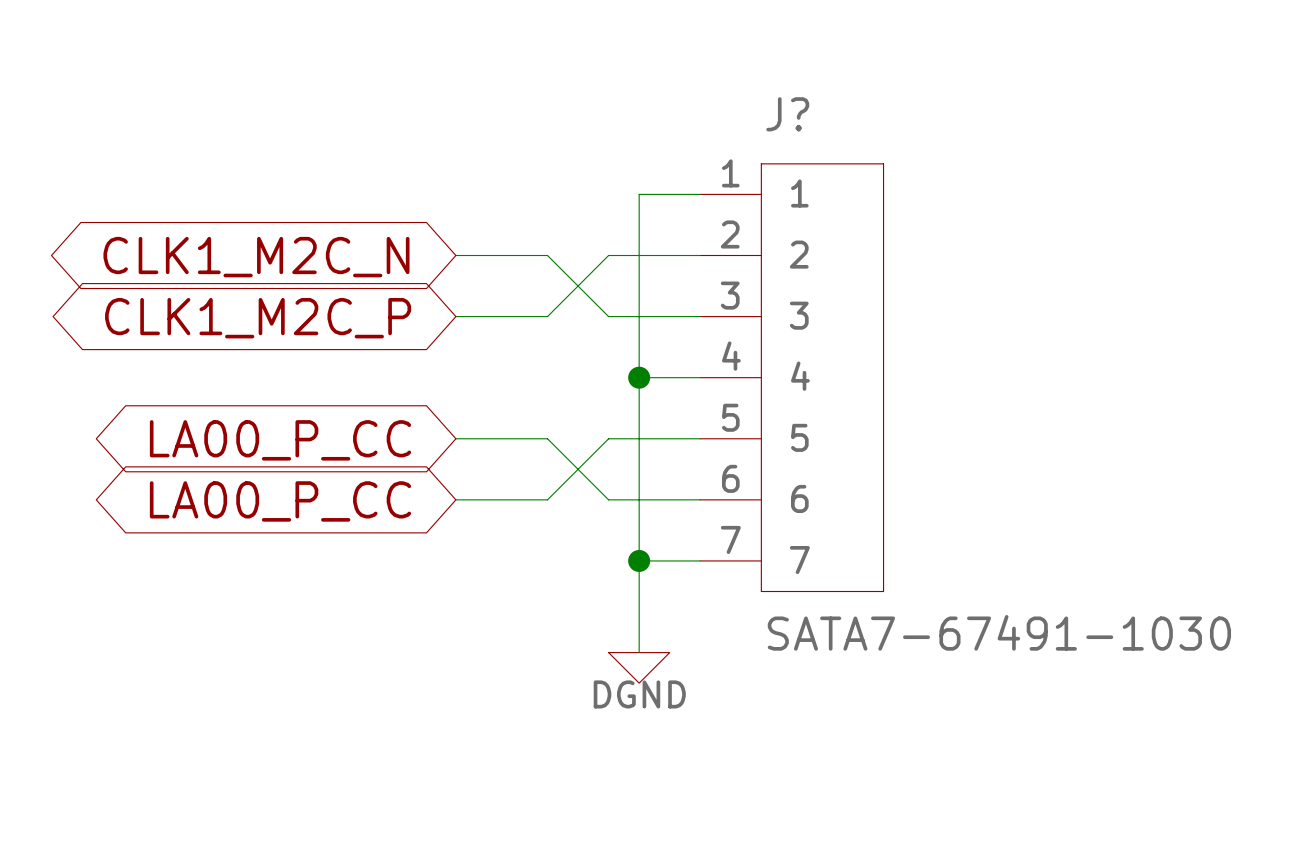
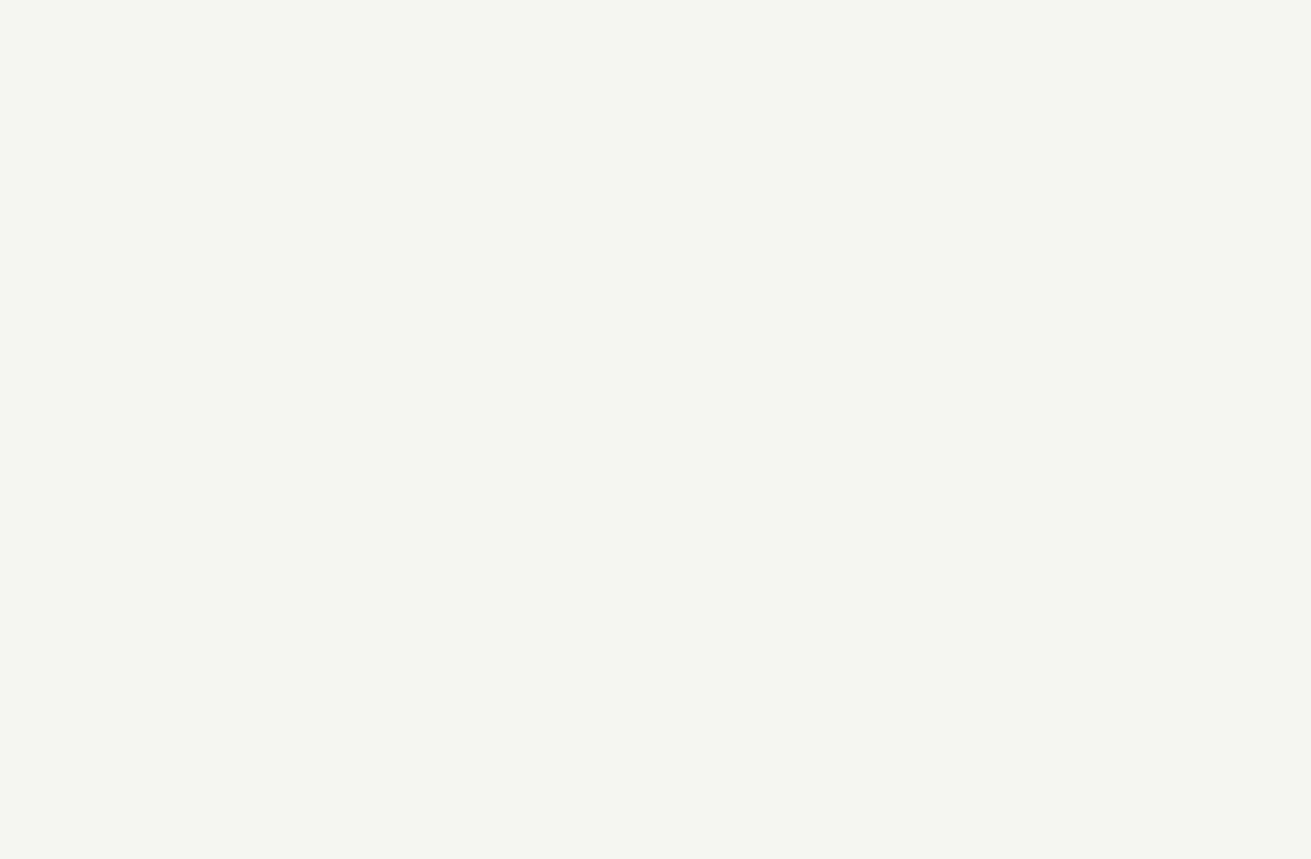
wire: (700, 194) (639, 194) (639, 652) -> none
wire: (455, 255) (547, 255) (608, 316) (700, 316) -> none
wire: (700, 255) (608, 255) (547, 316) (455, 316) -> none
global label: CLK1_M2C_N (256, 257) -> none
global label: CLK1_M2C_P (258, 318) -> none
wire: (639, 377) (700, 377) -> none
junction: (639, 377) -> none
J?: SATA7-67491-1030 (791, 377) -> none
wire: (455, 438) (547, 438) (608, 499) (700, 499) -> none
wire: (700, 438) (608, 438) (547, 499) (455, 499) -> none
global label: LA00_P_CC (280, 440) -> none
global label: LA00_P_CC (280, 501) -> none
wire: (639, 560) (700, 560) -> none
junction: (639, 560) -> none
power symbol: DGND (639, 667) -> none

